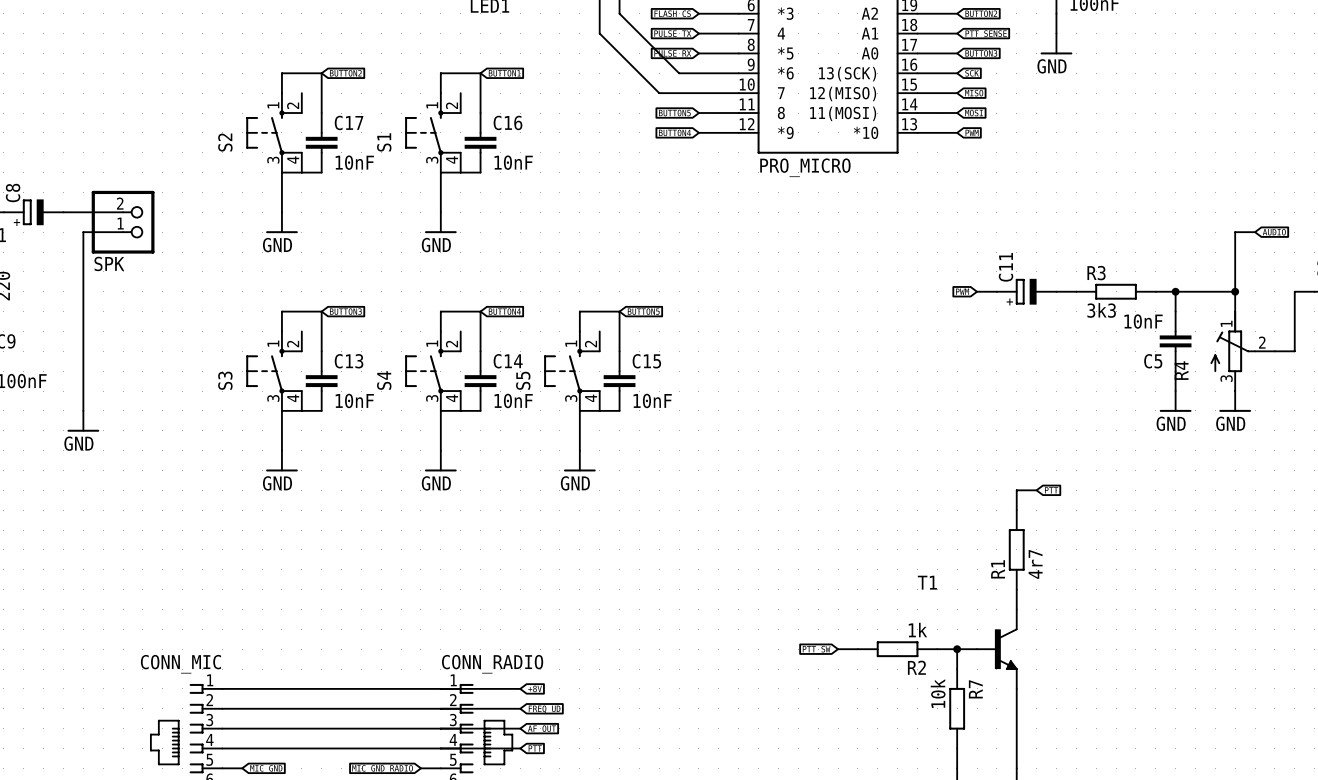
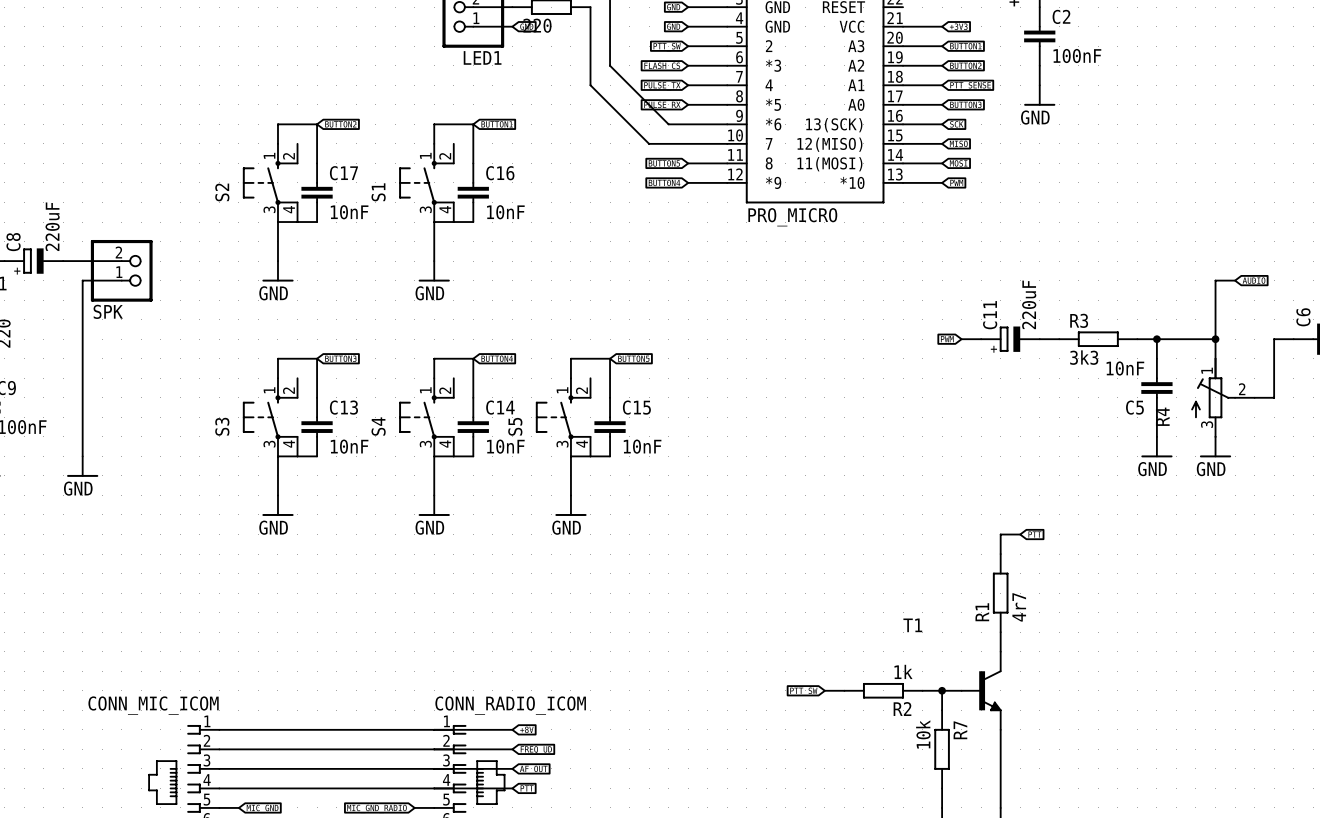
C8 value: none -> 220uF (52, 226)
C11 value: none -> 220uF (1029, 304)
CONN_MIC name: CONN_MIC (180, 664) -> CONN_MIC_ICOM (153, 705)
CONN_RADIO name: CONN_RADIO (492, 664) -> CONN_RADIO_ICOM (510, 705)

